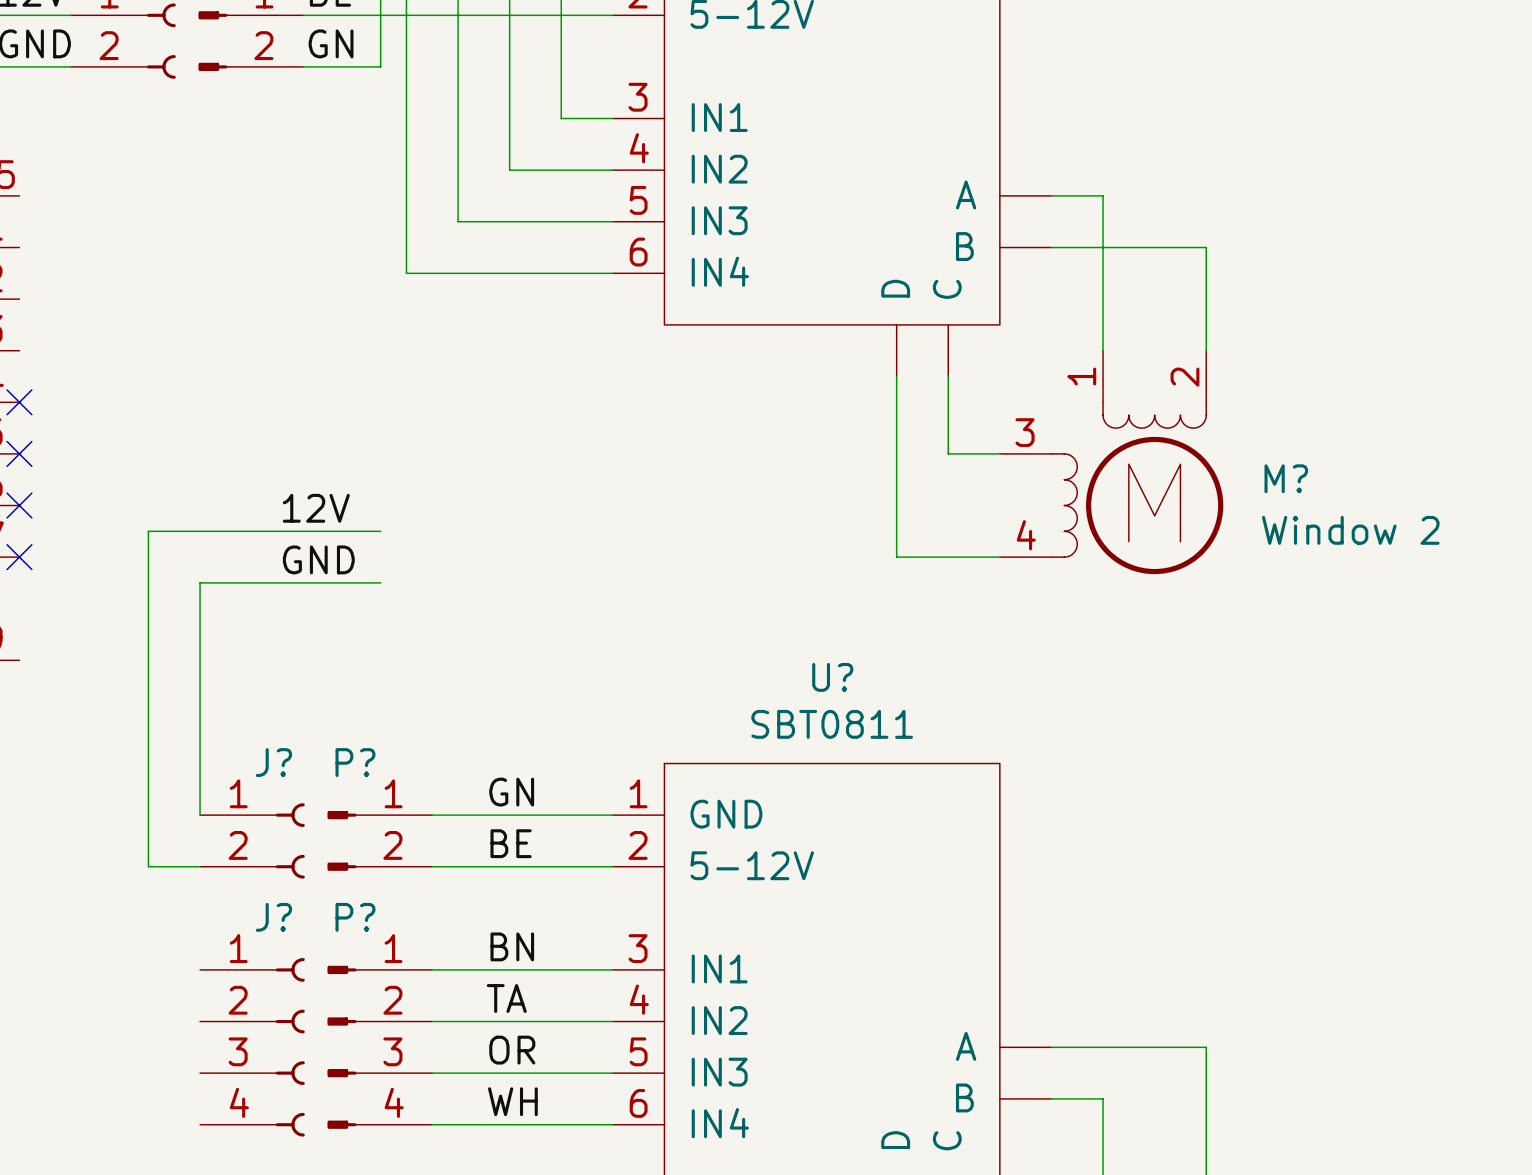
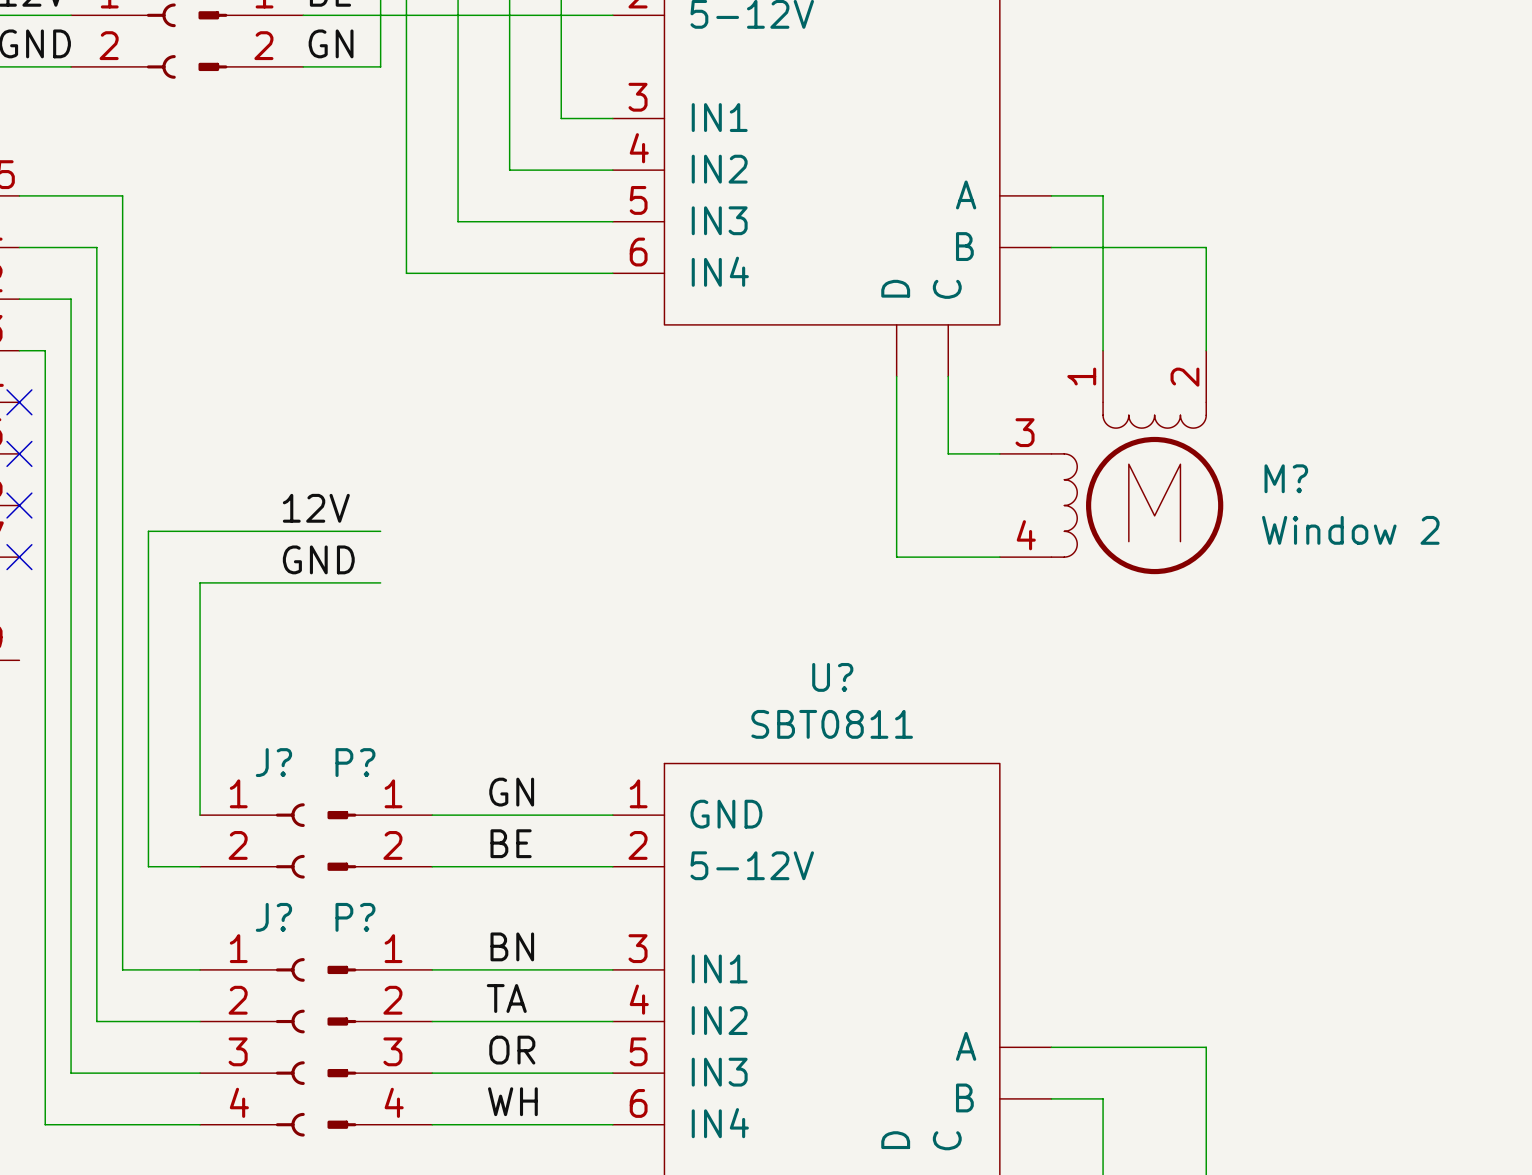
wire: none -> (19, 195) (122, 195) (122, 969) (200, 969)
wire: none -> (19, 247) (96, 247) (96, 1021) (200, 1021)
wire: none -> (19, 299) (71, 299) (71, 1073) (200, 1073)
wire: none -> (19, 350) (45, 350) (45, 1124) (200, 1124)

